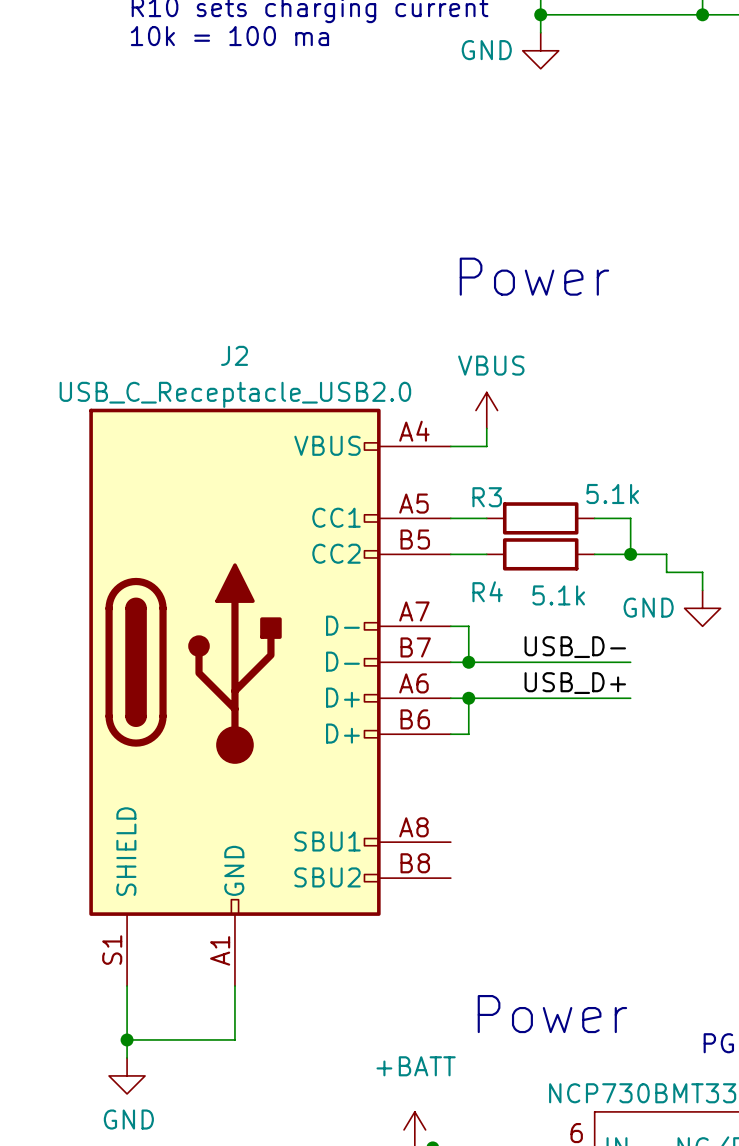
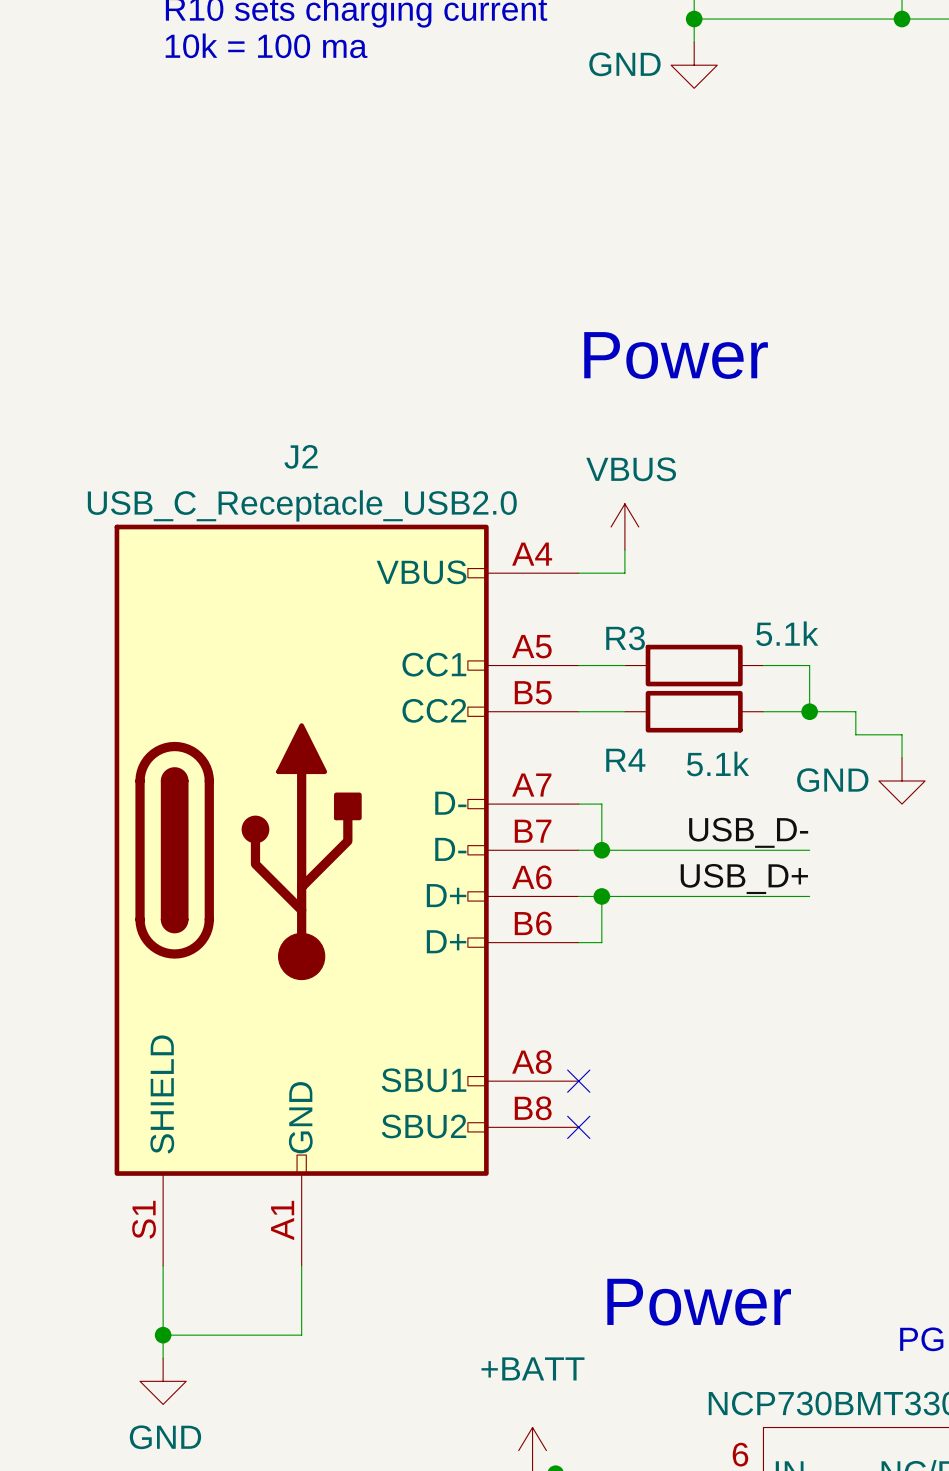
no-connect mark: none -> (578, 1081)
no-connect mark: none -> (578, 1127)

